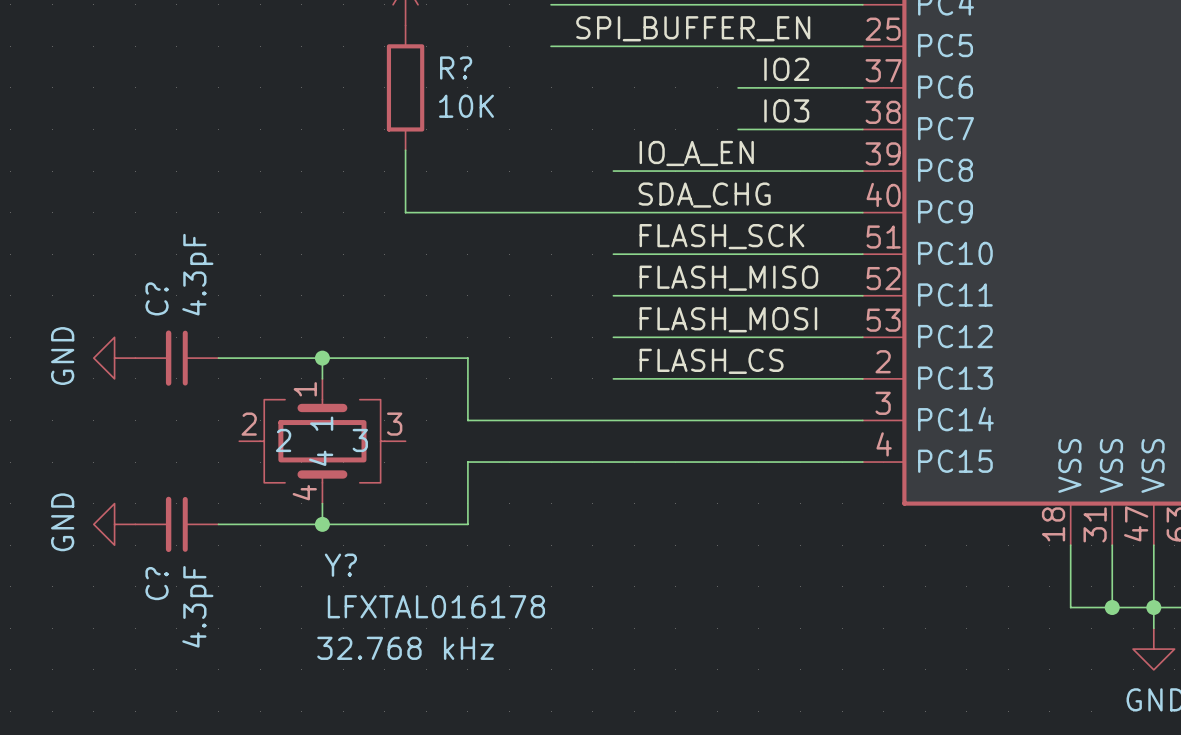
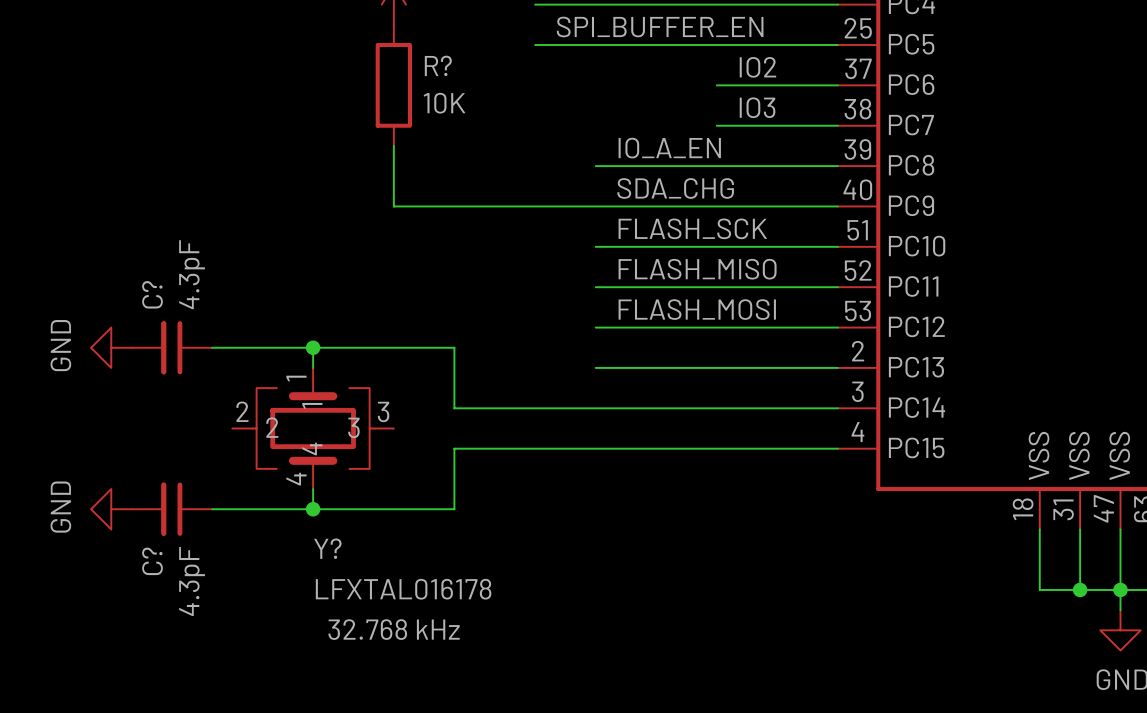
label: FLASH_CS (711, 361) -> none

